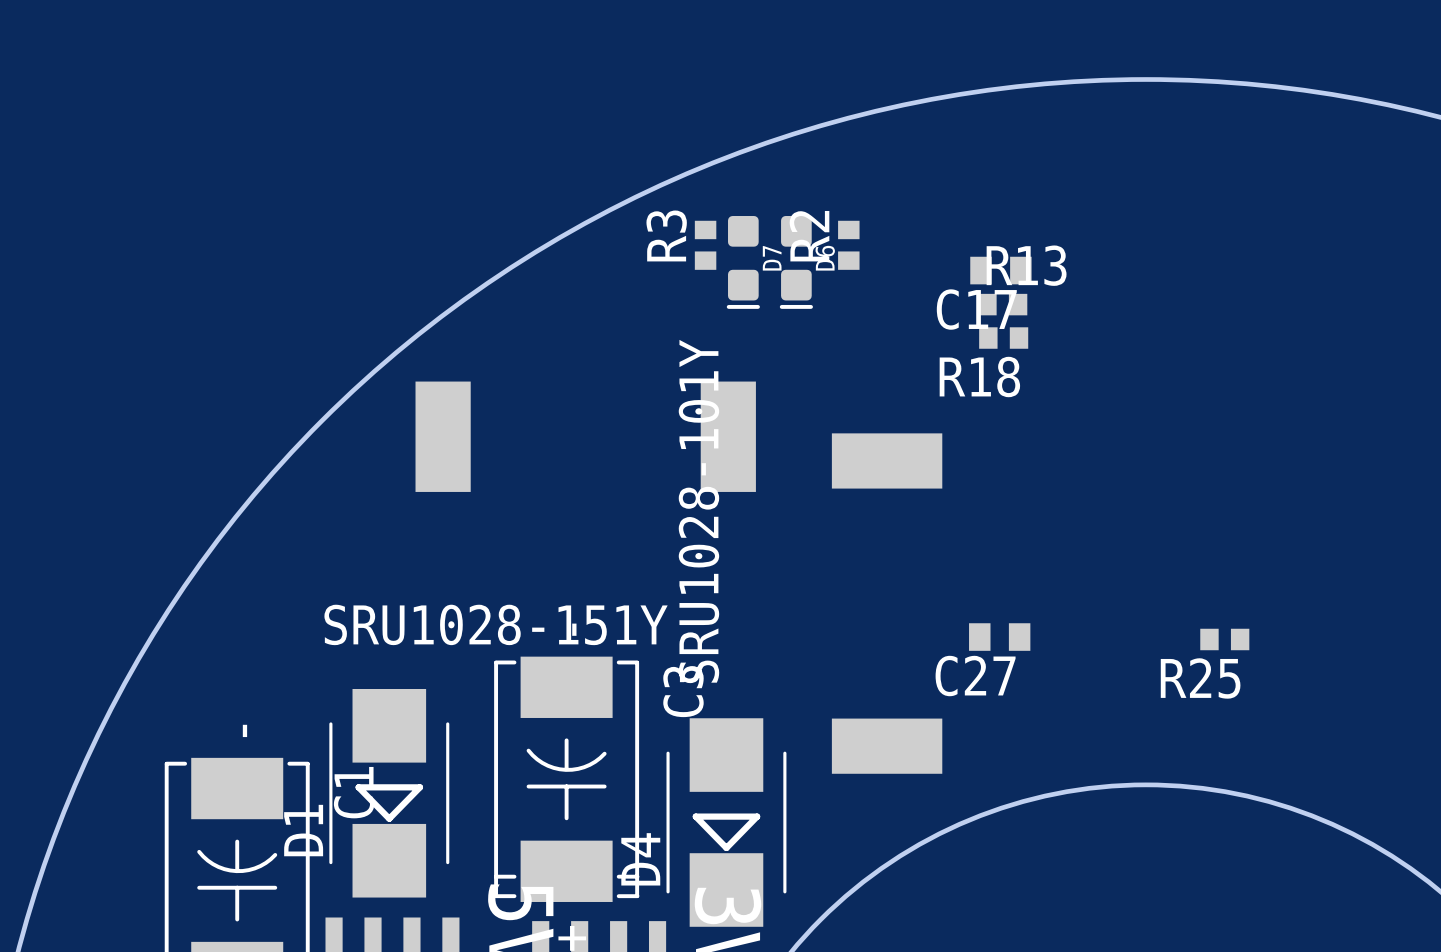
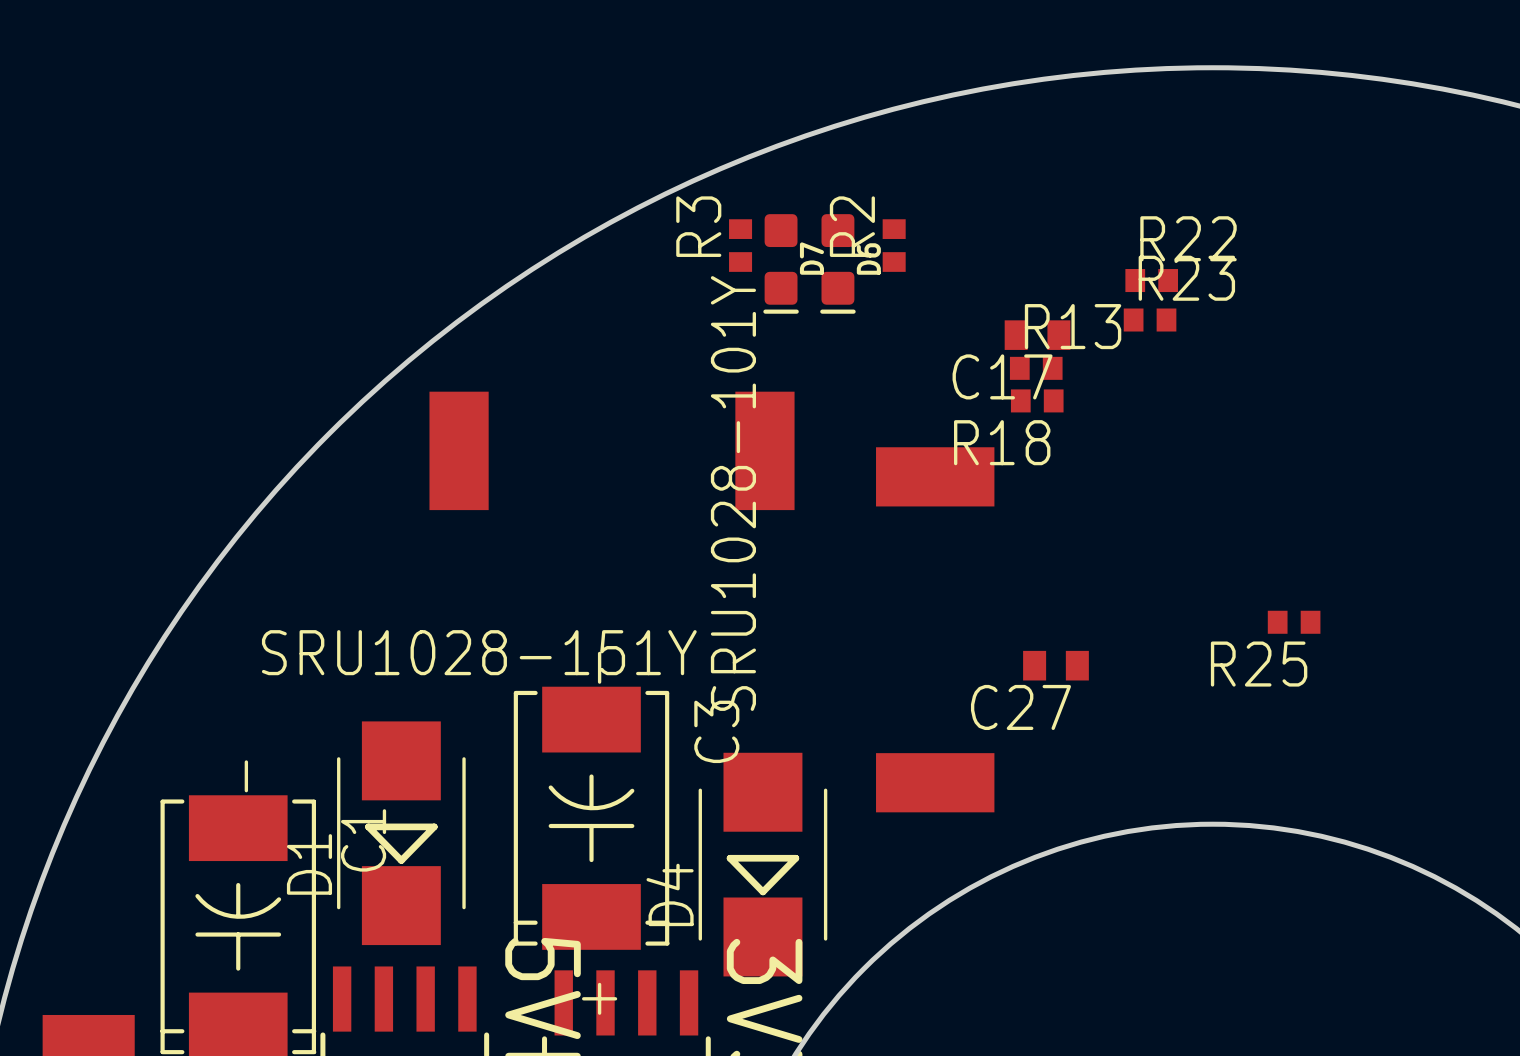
C17 position: (1000, 270) -> (1037, 335)
R22: none -> (1151, 280)
R13 position: (1002, 304) -> (1036, 368)
R23: none -> (1150, 320)
R18 position: (1003, 338) -> (1037, 400)
R25 position: (1224, 639) -> (1294, 622)

